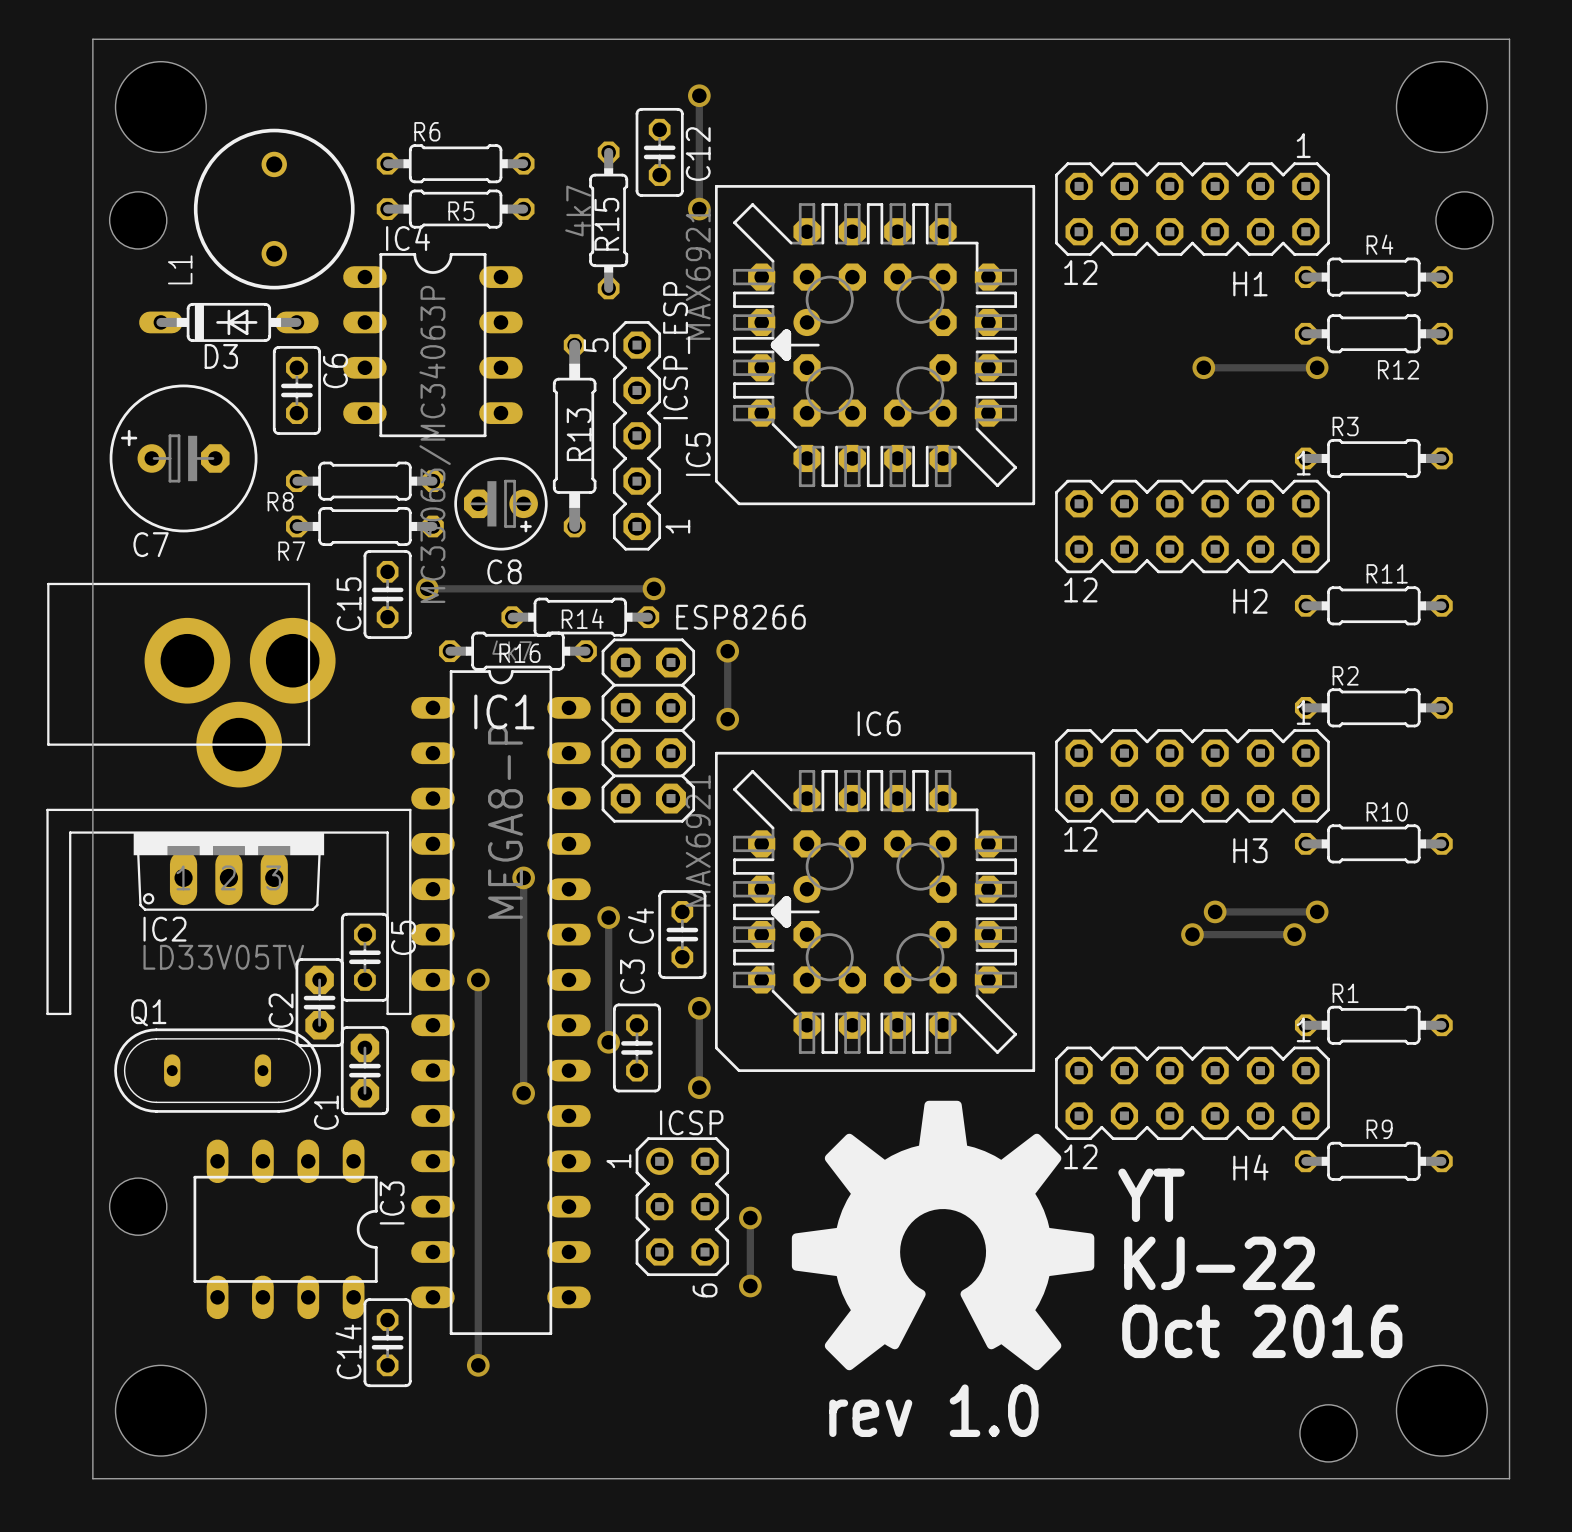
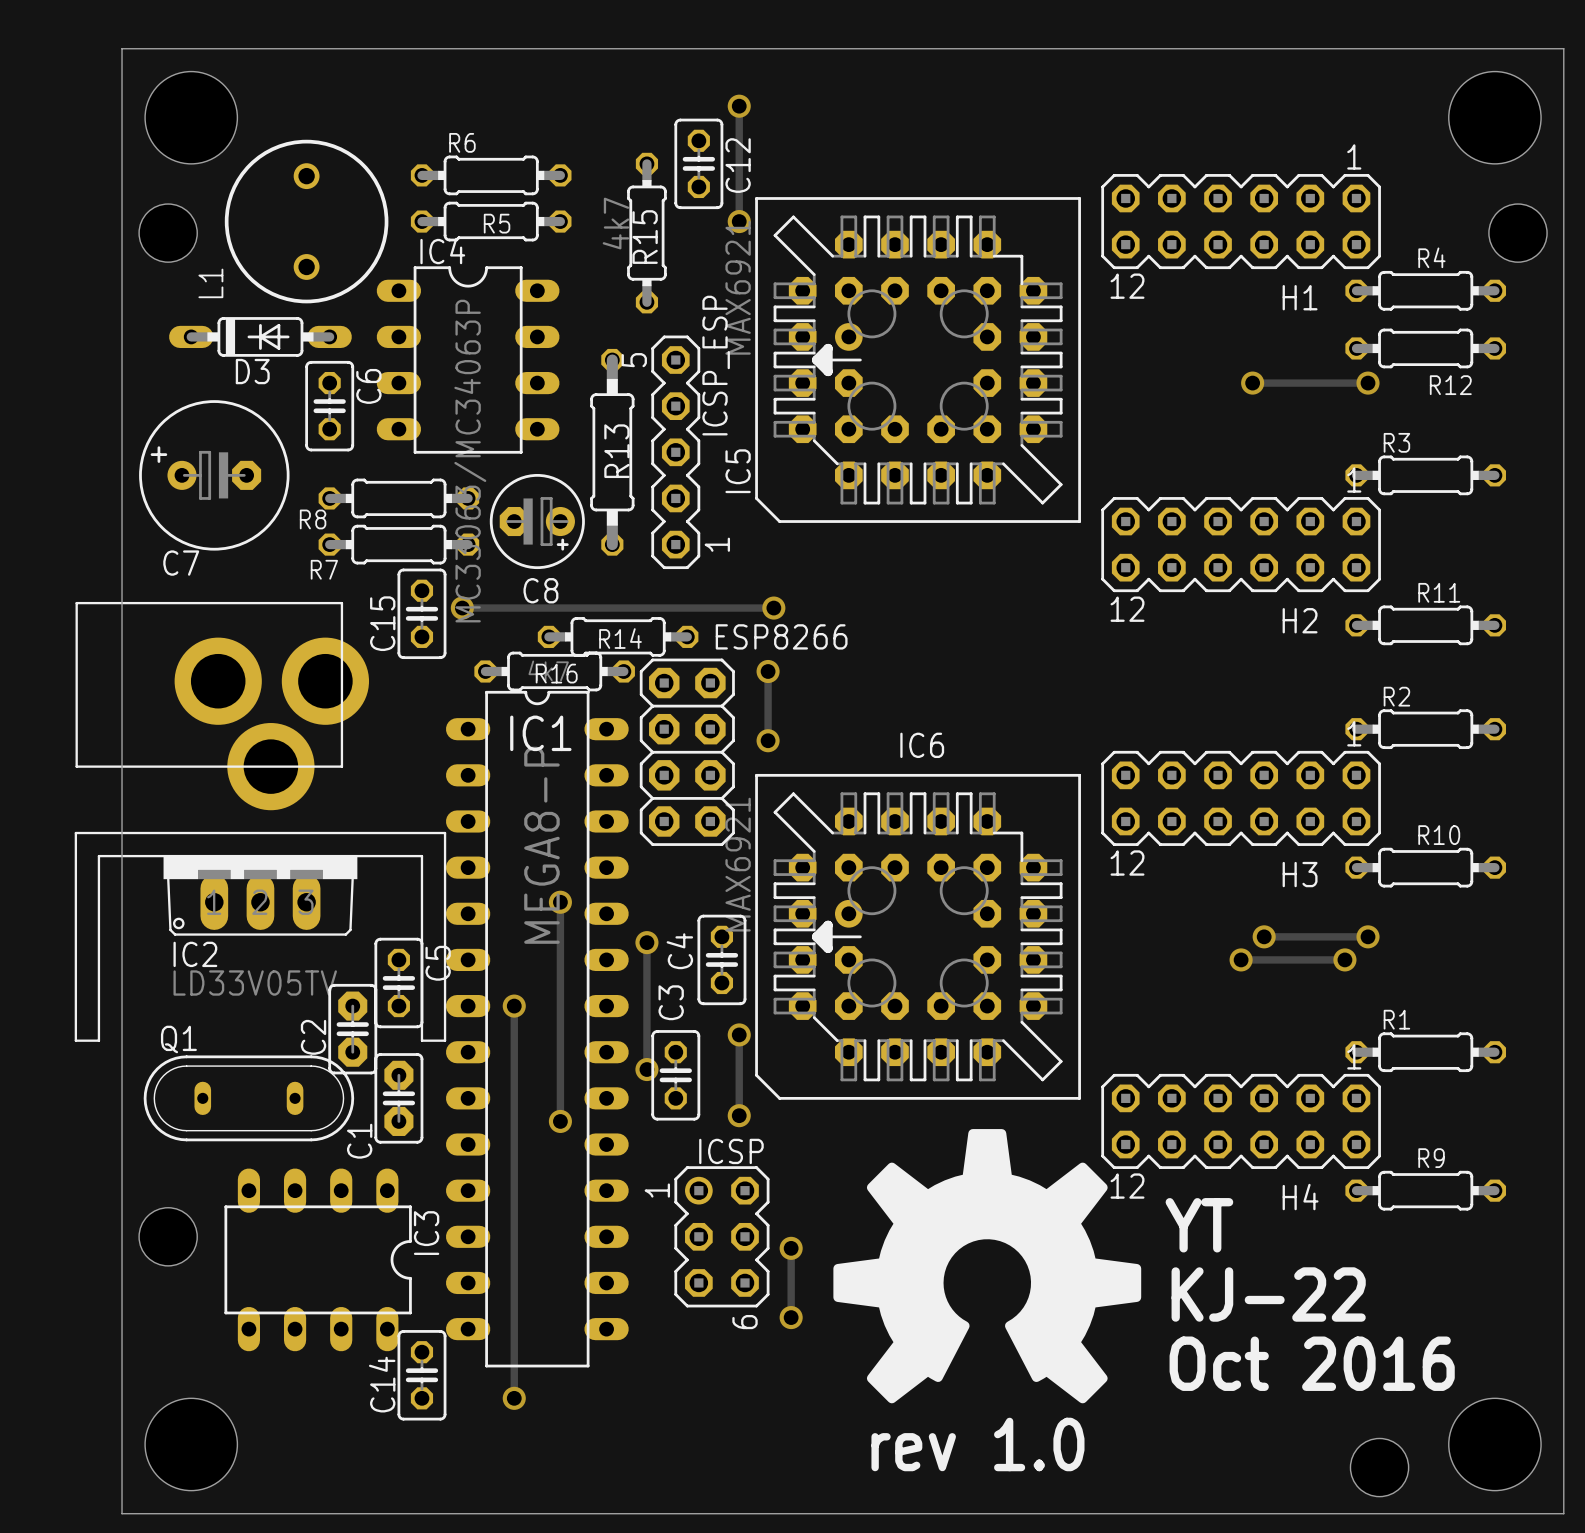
track: none -> (693, 608) (773, 608)
via position: (654, 588) -> (773, 608)

